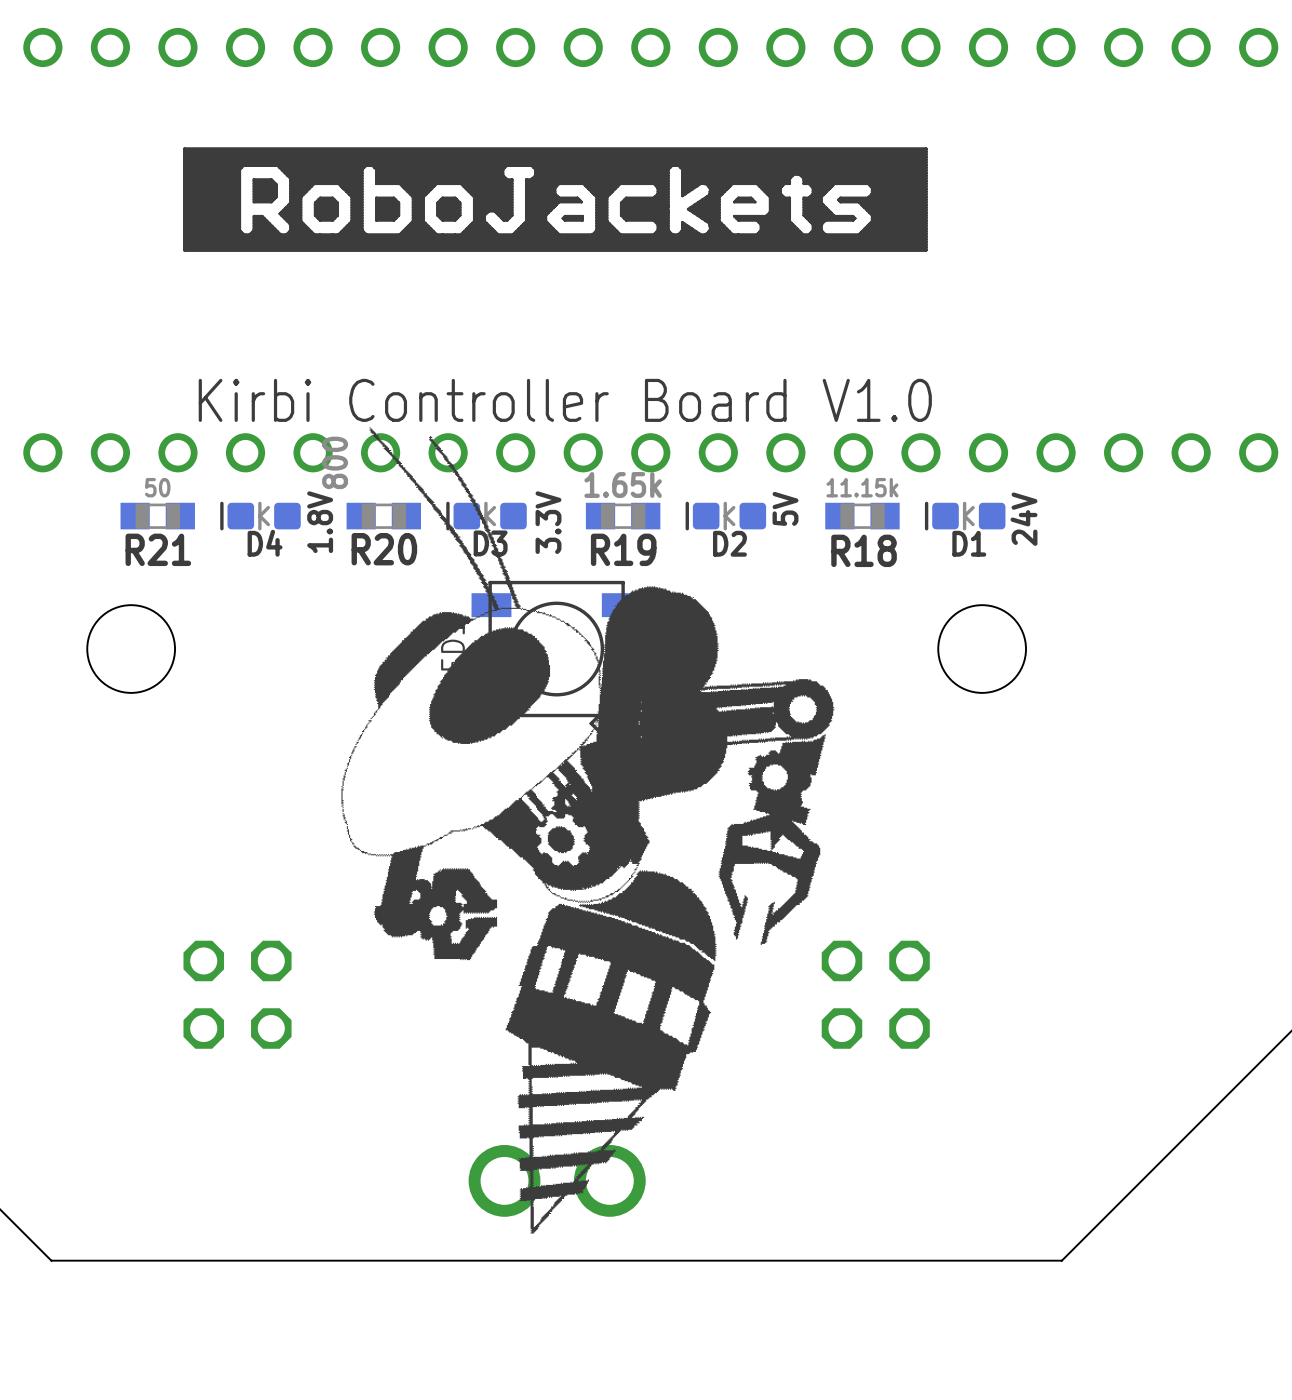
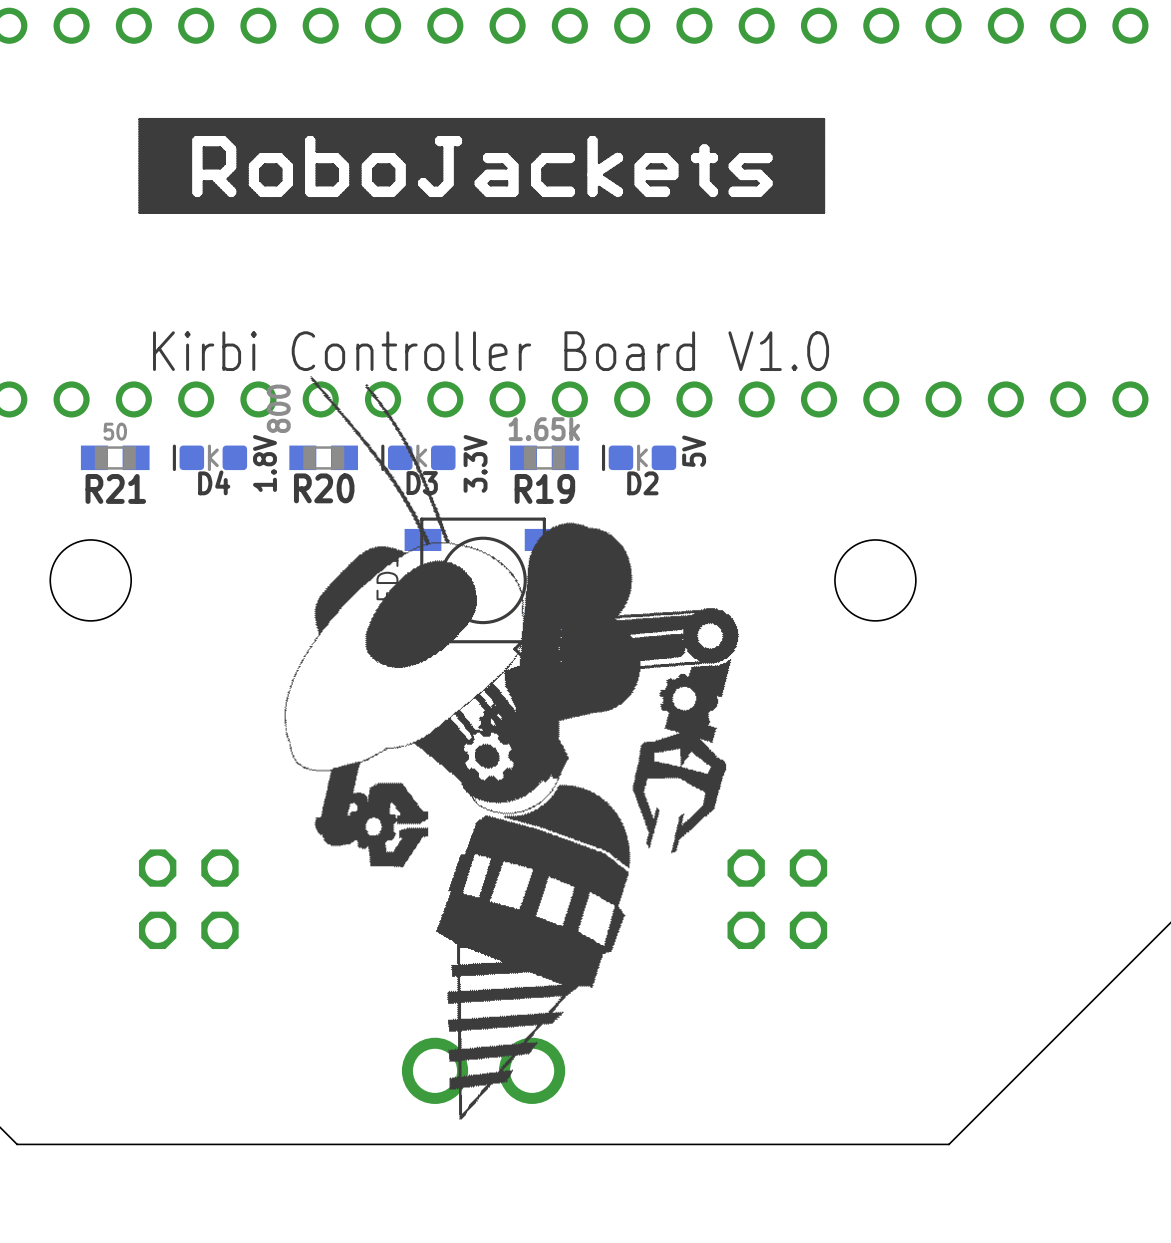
R18: 11.15k (862, 516) -> none
D1: 24V (965, 516) -> none

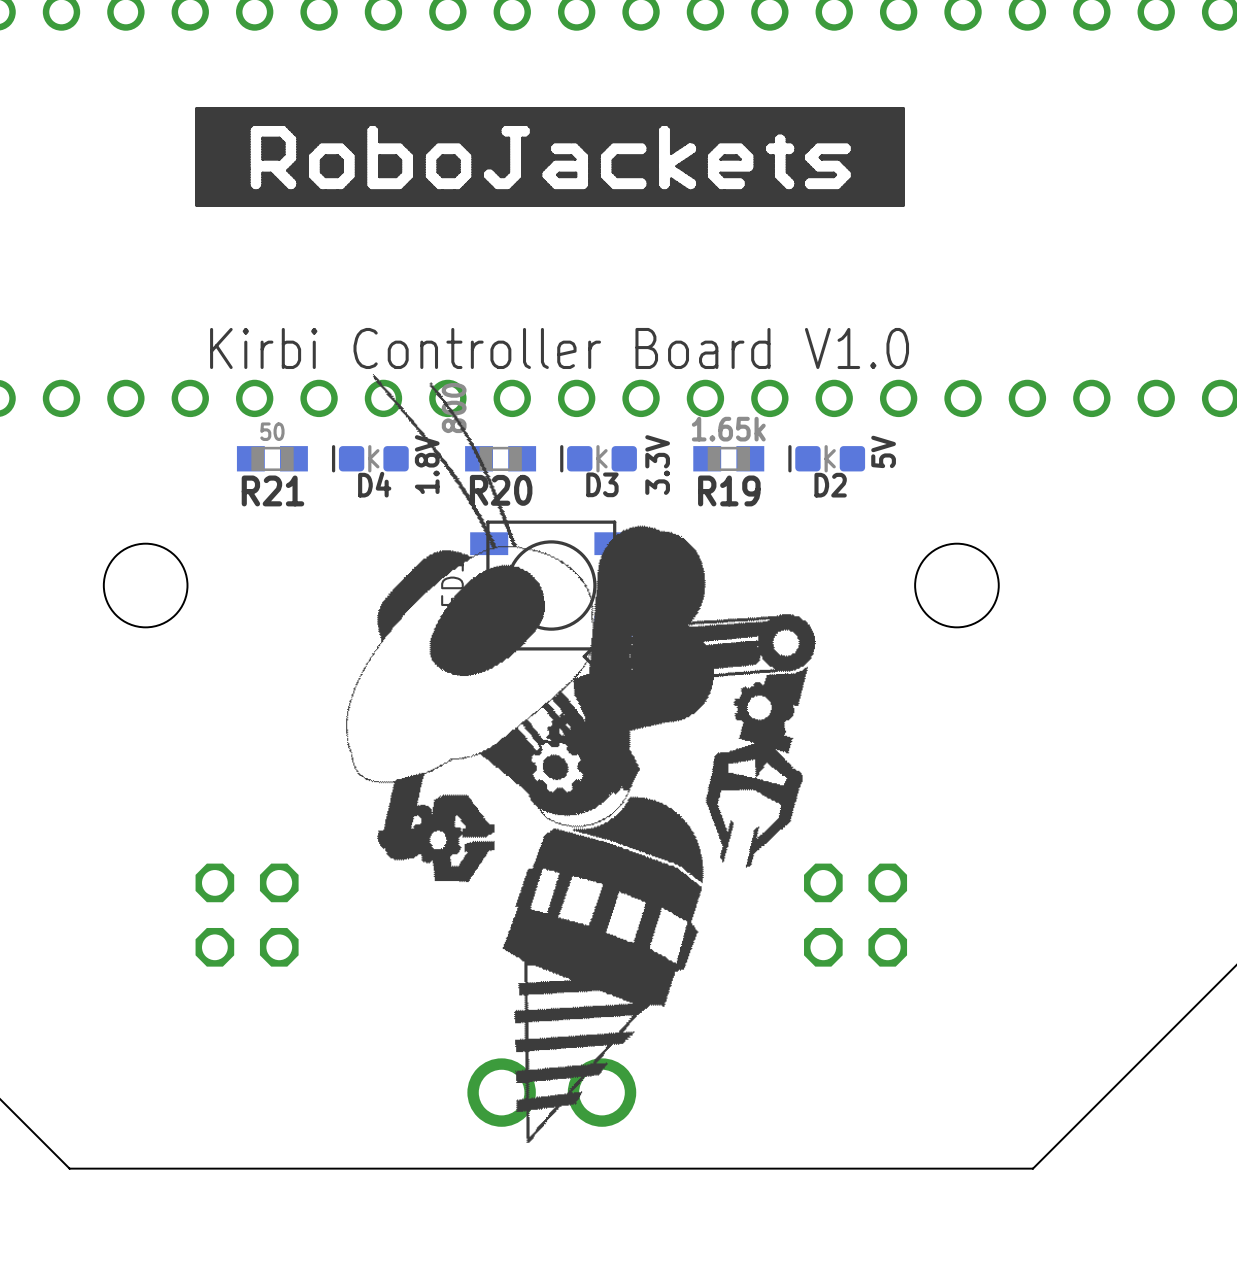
R21 position: (115, 457) -> (272, 458)
D4 position: (209, 457) -> (370, 458)
R20 position: (323, 457) -> (500, 458)
D3 position: (418, 457) -> (598, 458)
R19 position: (544, 457) -> (728, 458)
D2 position: (639, 457) -> (826, 458)

